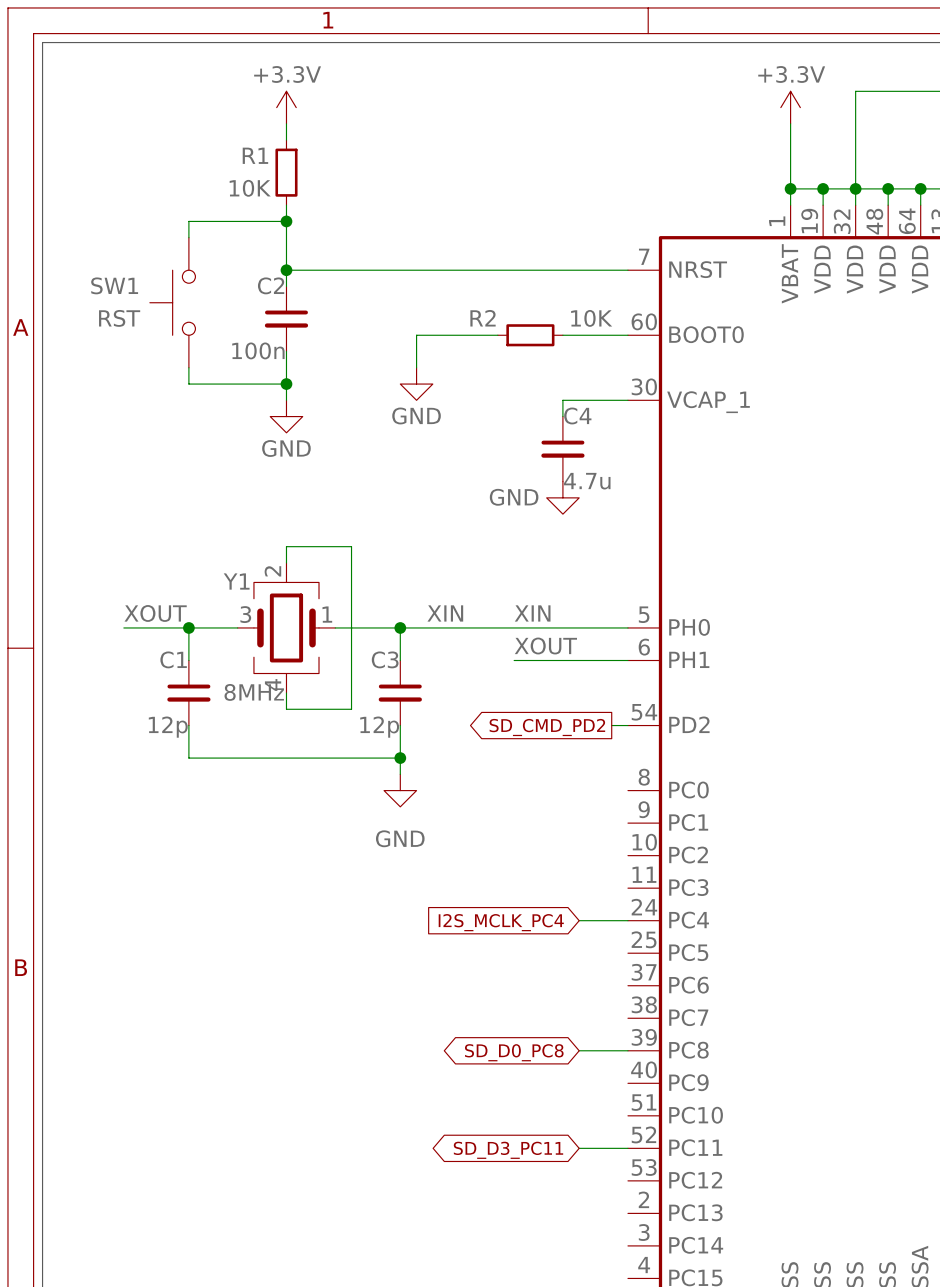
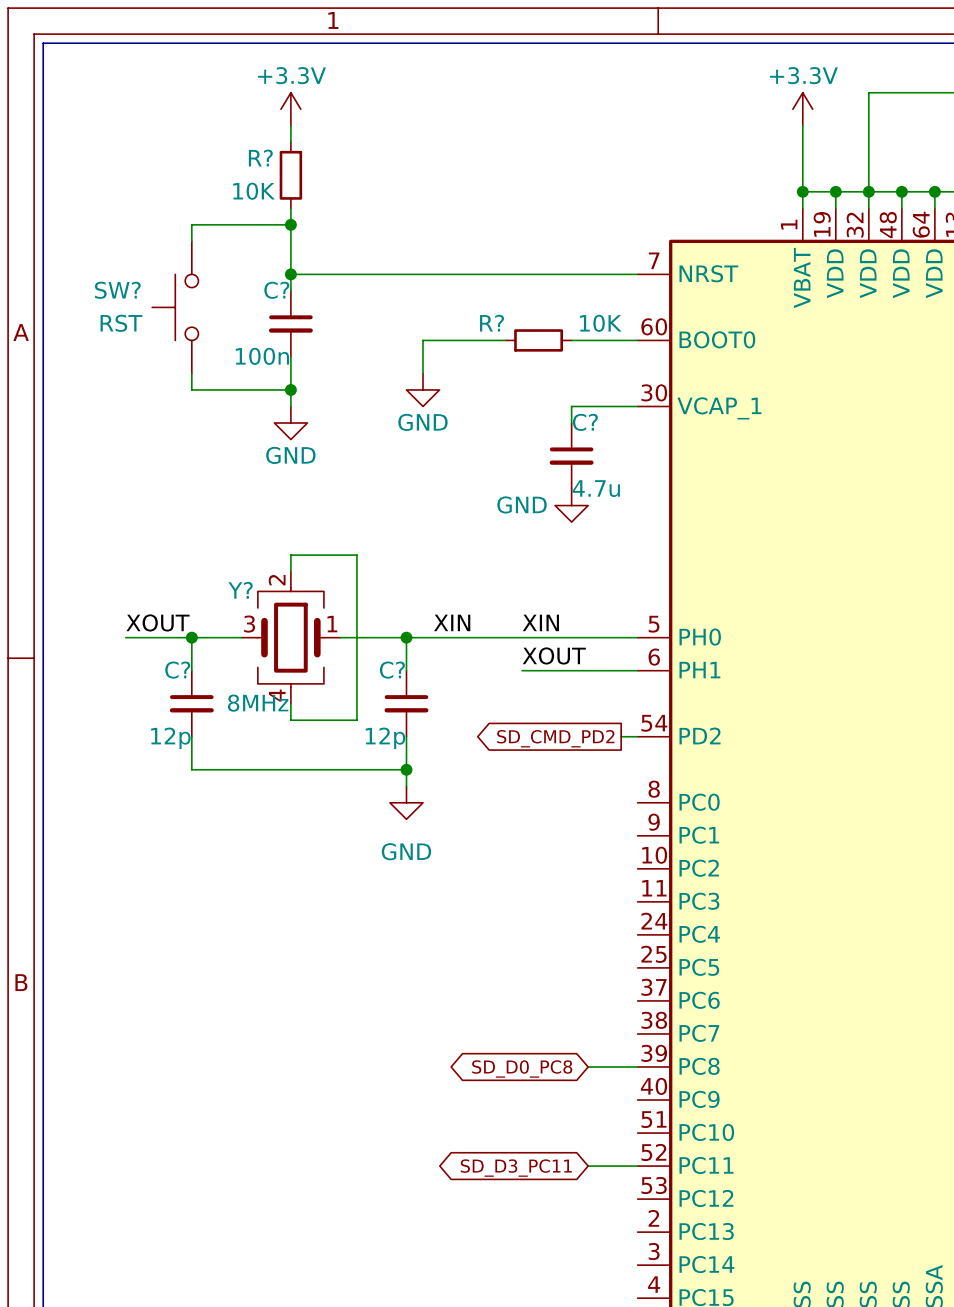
R1 name: R1 (255, 155) -> R? (260, 158)
SW1 name: SW1 (114, 285) -> SW? (117, 290)
C2 name: C2 (271, 285) -> C? (276, 290)
R2 name: R2 (483, 318) -> R? (492, 323)
C4 name: C4 (577, 415) -> C? (585, 422)
Y1 name: Y1 (236, 581) -> Y? (240, 590)
C1 name: C1 (173, 659) -> C? (177, 670)
C3 name: C3 (385, 659) -> C? (392, 670)
wire: (579, 920) (627, 920) -> none
global label: I2S_MCLK_PC4 (501, 922) -> none

